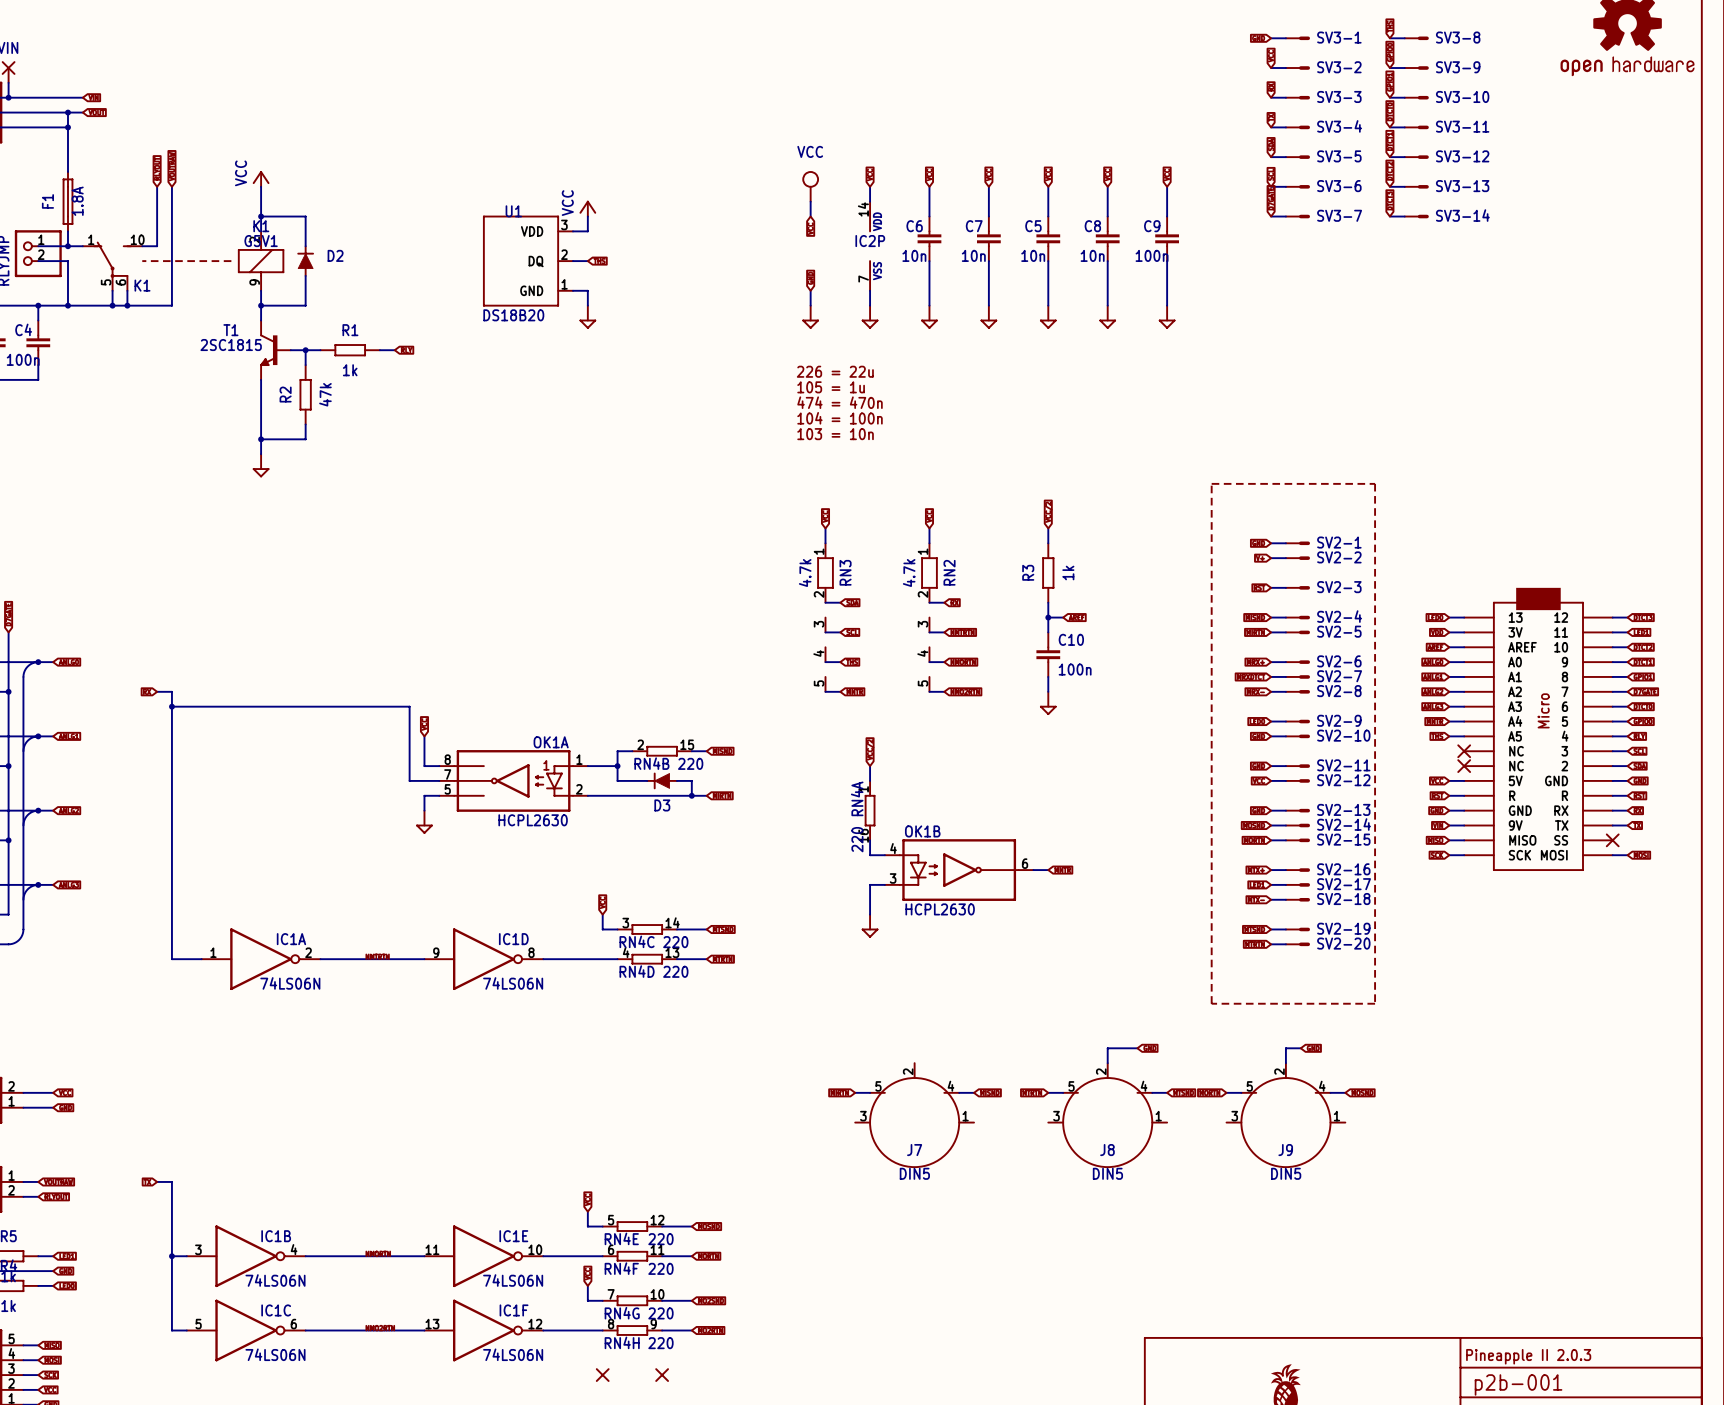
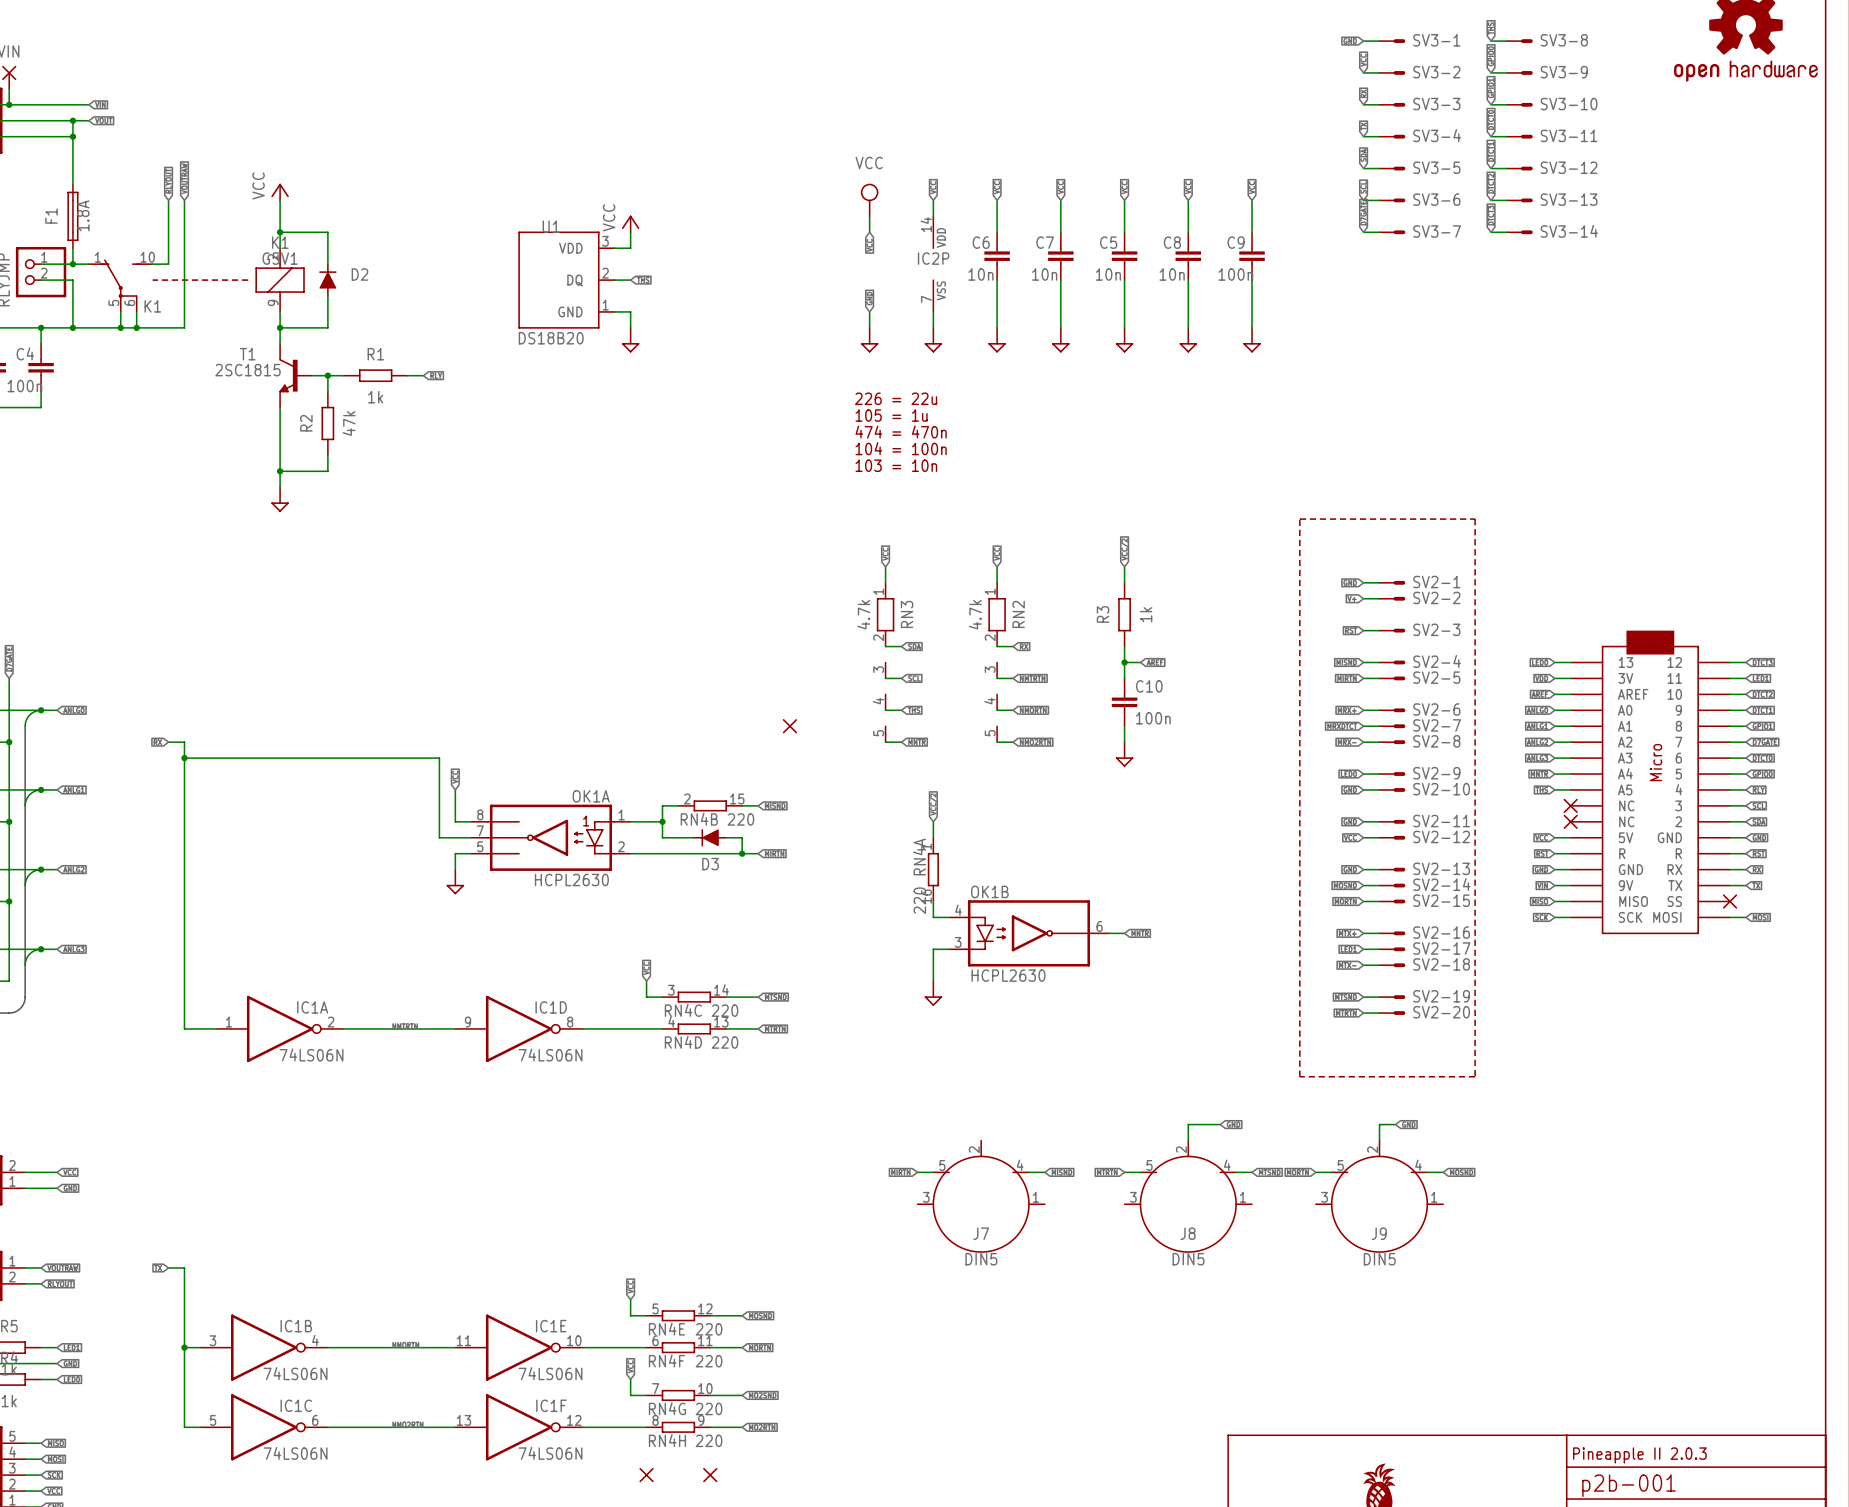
part: none -> (789, 726)

